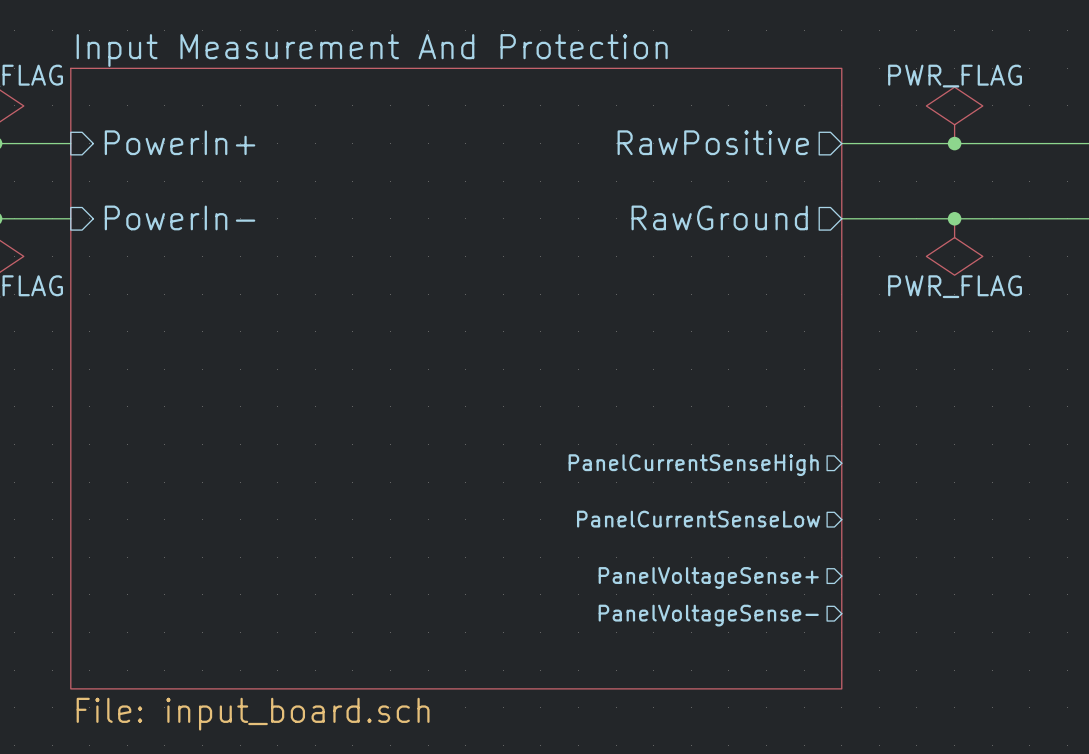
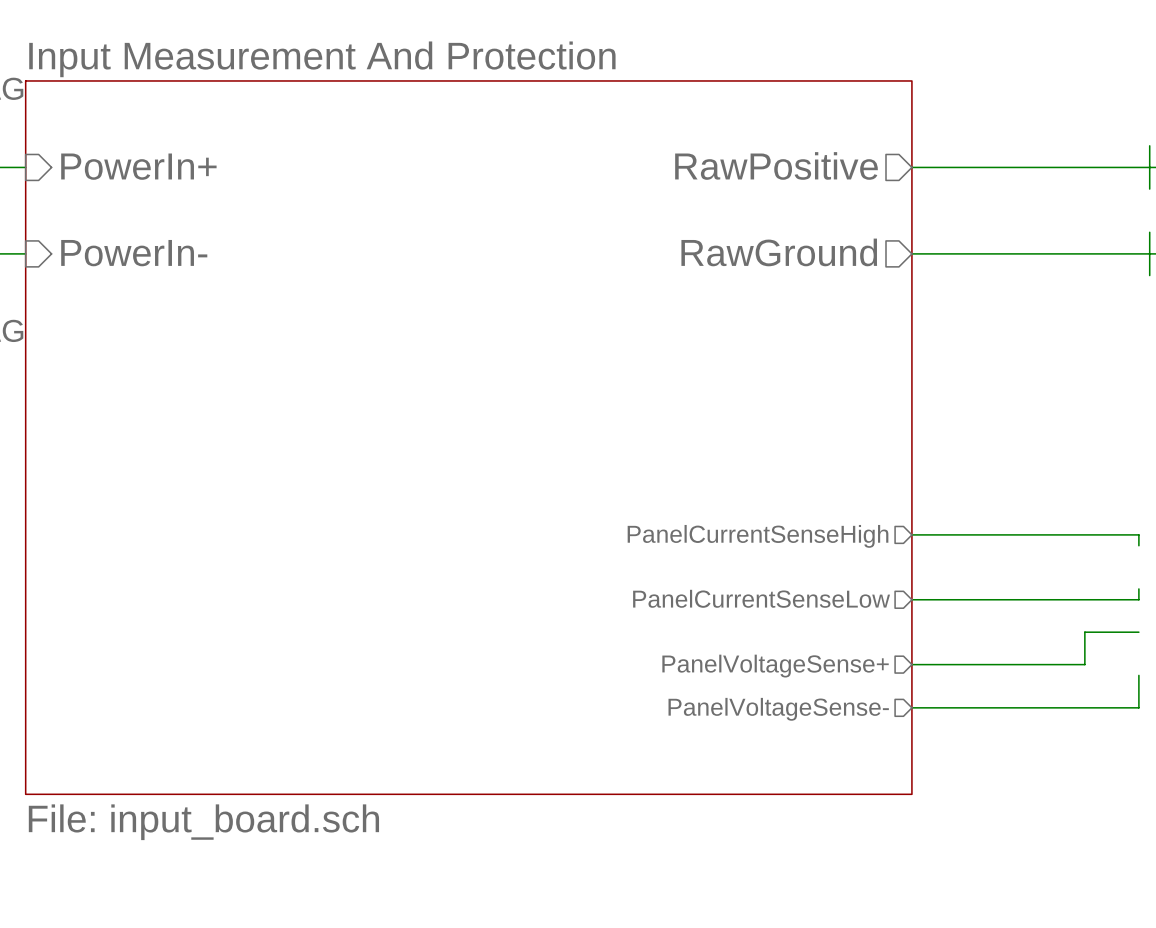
power symbol: PWR_FLAG (954, 115) -> none
wire: none -> (1149, 145) (1149, 189)
junction: (954, 143) -> none
wire: none -> (1149, 232) (1149, 275)
junction: (954, 218) -> none
power symbol: PWR_FLAG (954, 246) -> none
wire: none -> (911, 534) (1138, 534) (1138, 545)
wire: none -> (1138, 588) (1138, 599) (911, 599)
wire: none -> (1138, 632) (1084, 632) (1084, 664) (911, 664)
wire: none -> (1138, 675) (1138, 707) (911, 707)

